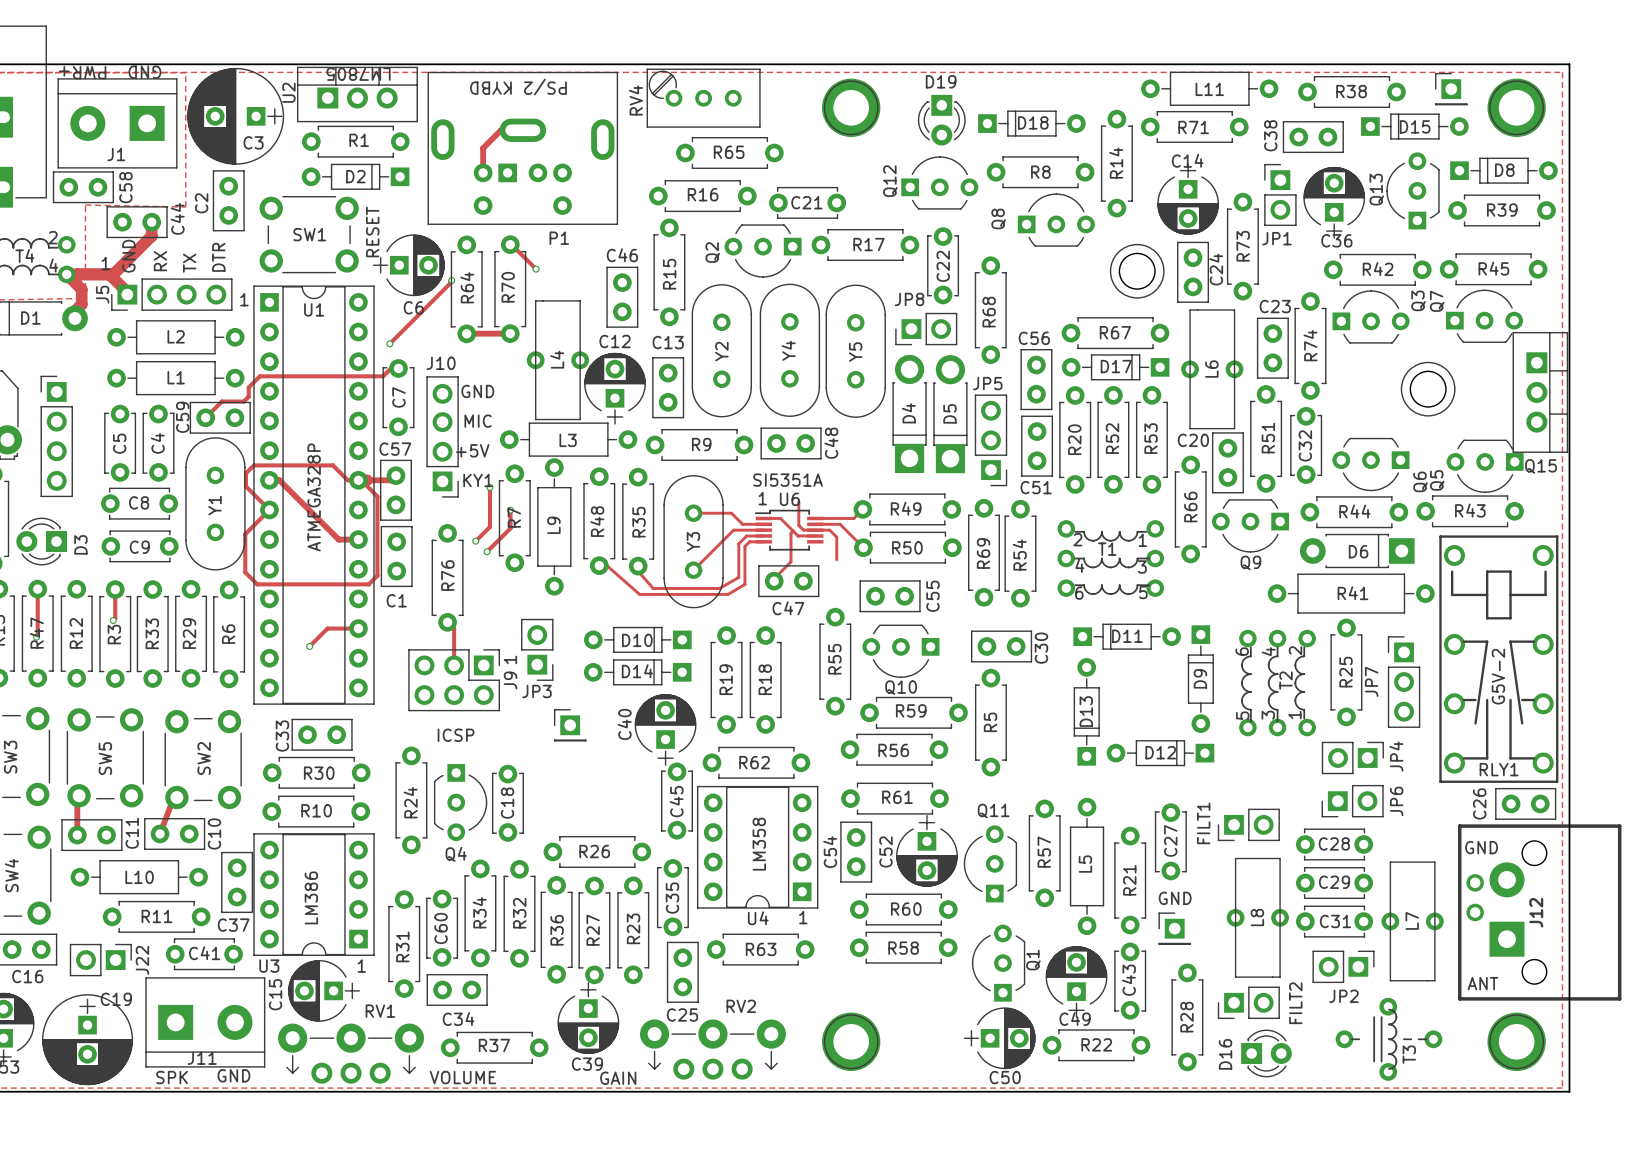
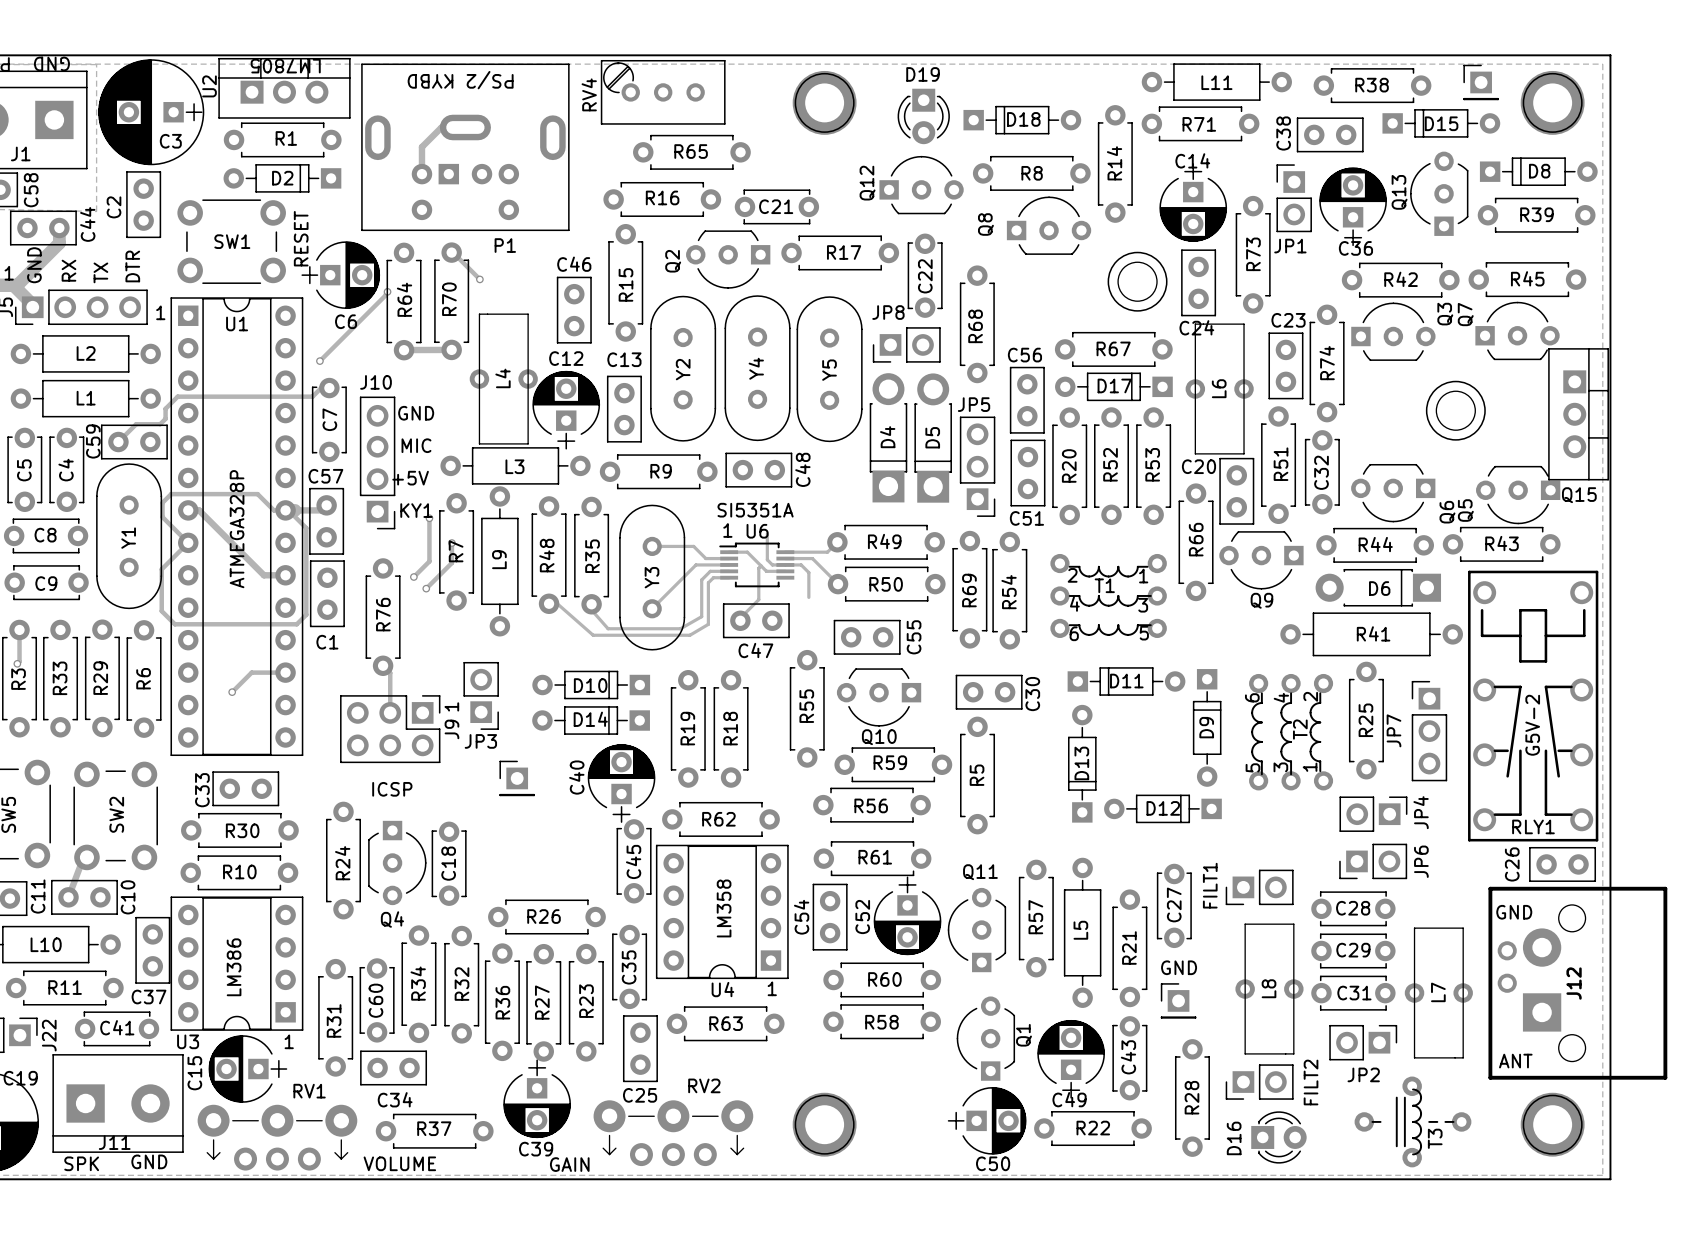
C24 name rotation: 0° (1216, 269) -> 90° clockwise (1196, 327)
C24 name position: C24 (1216, 269) -> C24 (1196, 327)

